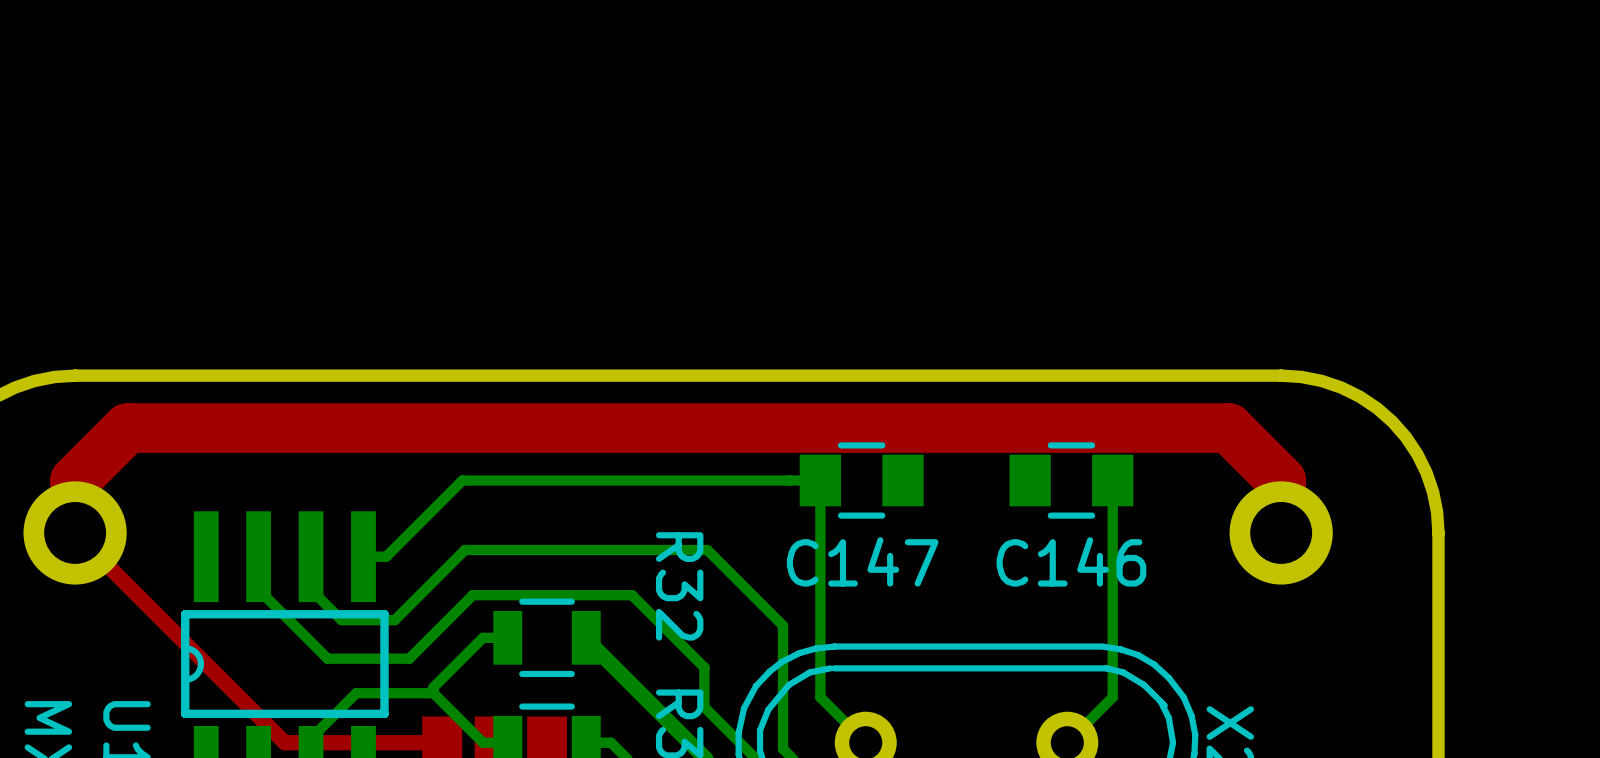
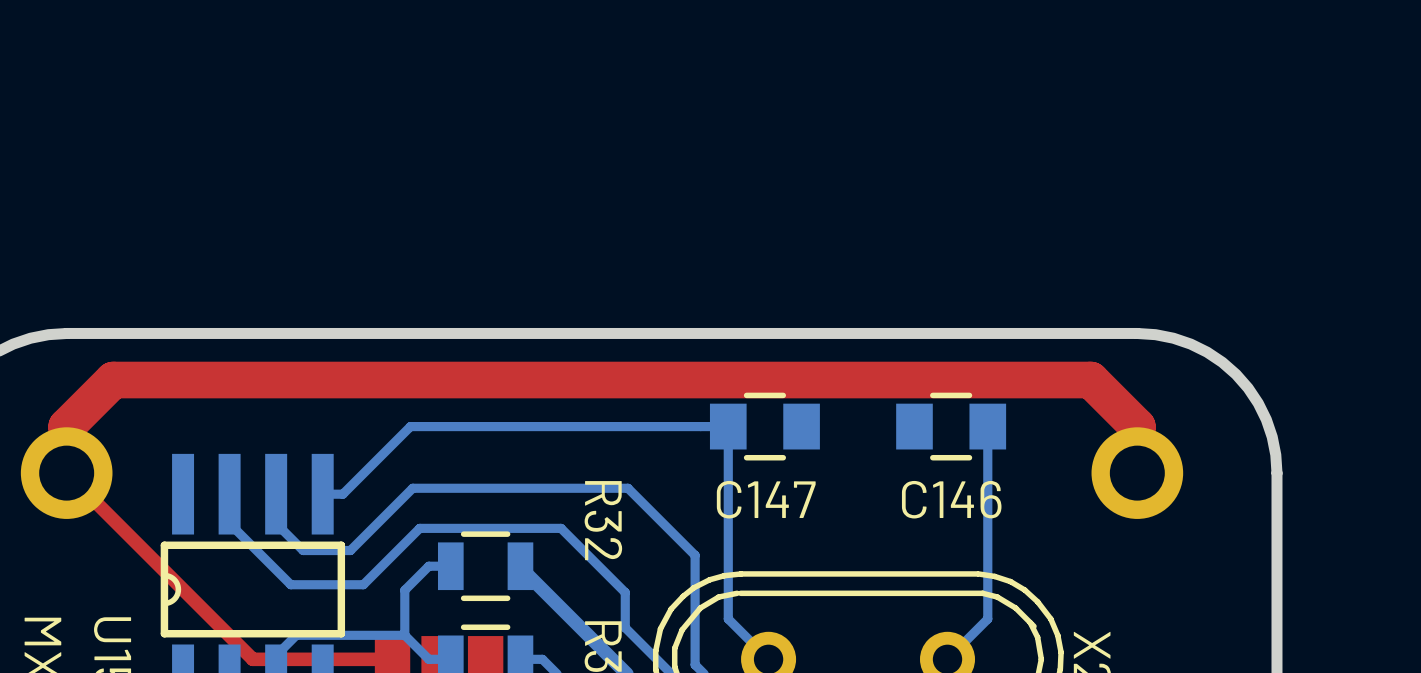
top track width: thick (1281, 532) (1281, 480) (1228, 428) (127, 428) (75, 480) (75, 532) -> thin (1137, 473) (1137, 426) (1090, 380) (113, 380) (66, 426) (66, 473)
bottom track: (456, 664) (433, 687) (433, 693) -> none
bottom track: (433, 693) (356, 693) (333, 715) -> (404, 590) (404, 635) (296, 635)
bottom track: (433, 693) (456, 715) -> none

